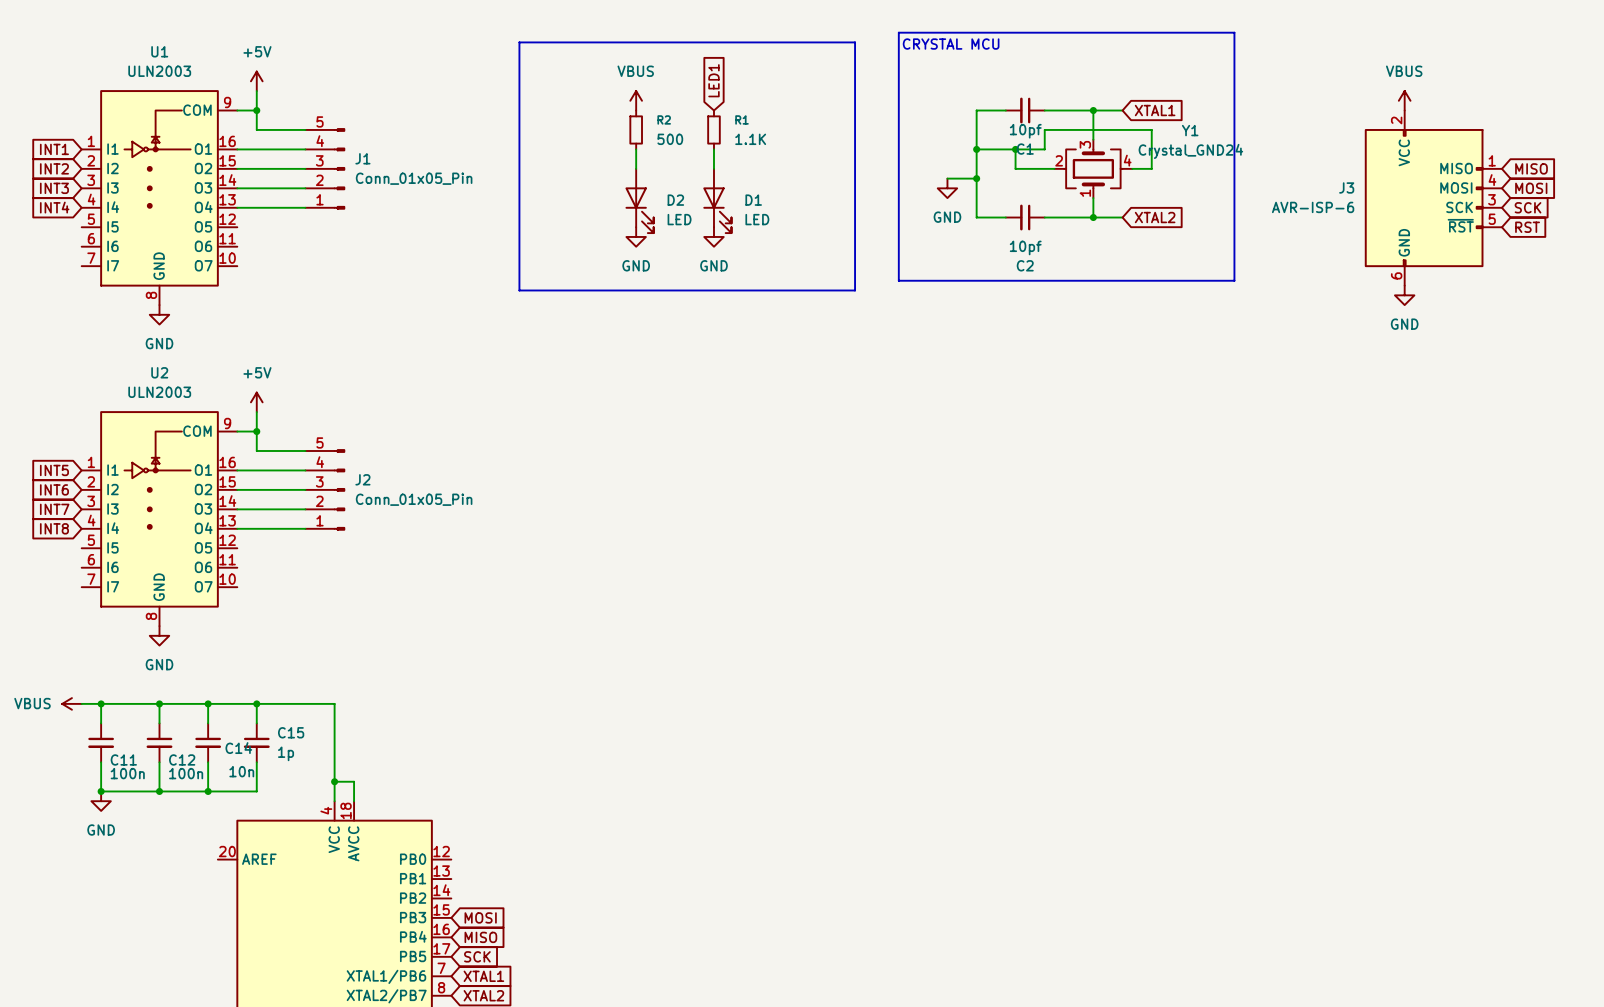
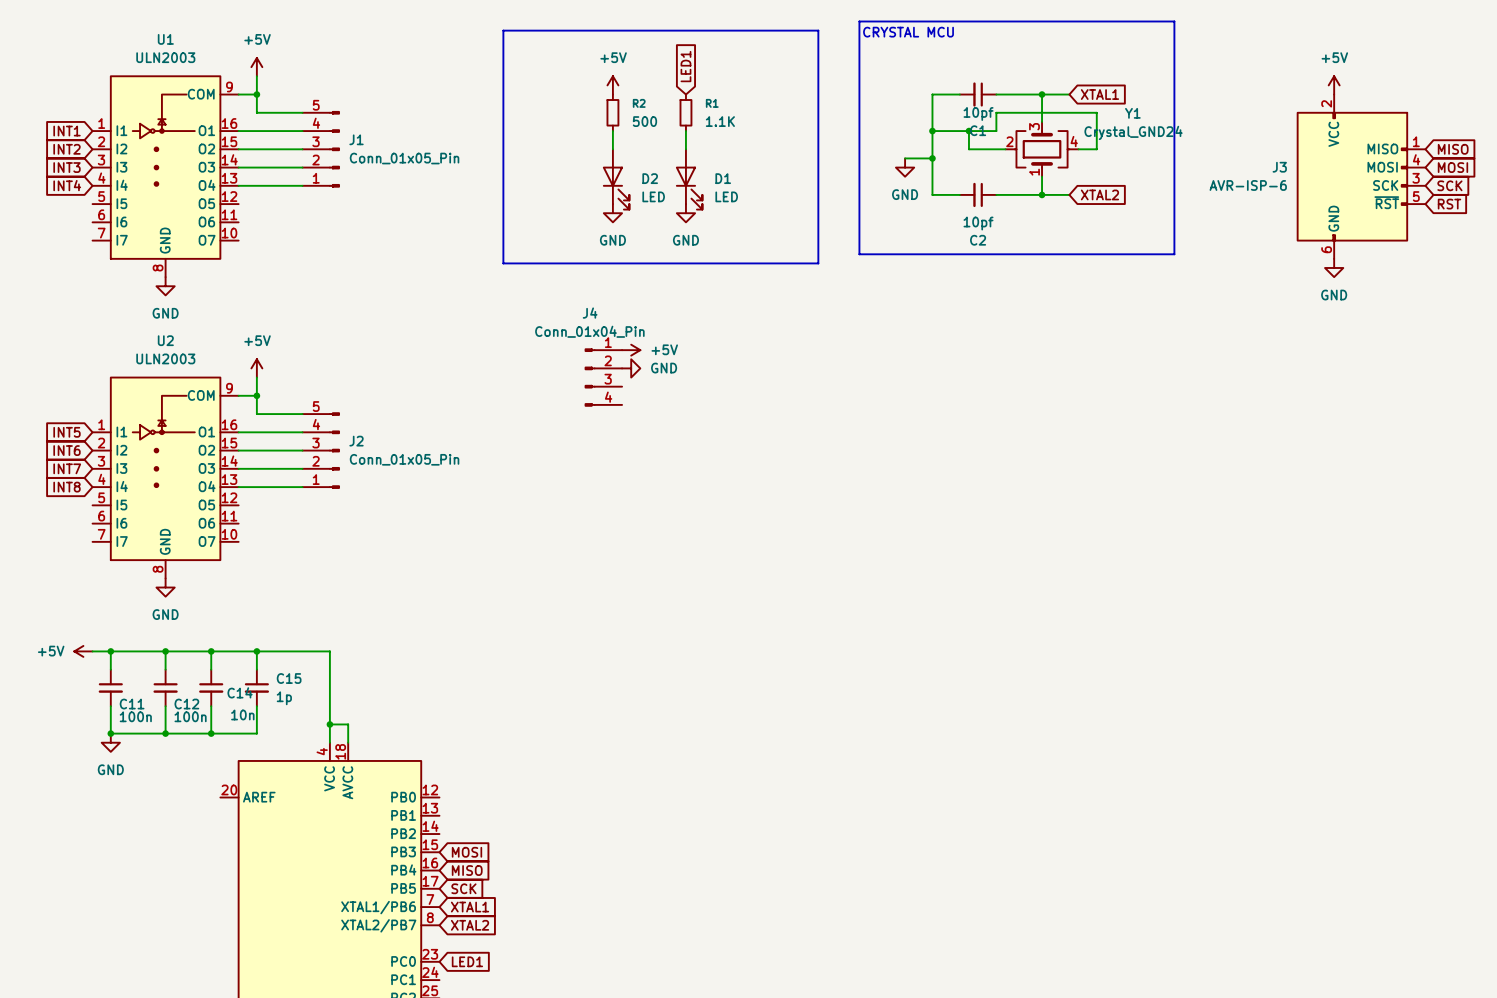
power symbol: VBUS (636, 100) -> +5V (612, 85)
power symbol: VBUS (1404, 100) -> +5V (1334, 85)
power symbol: none -> +5V (631, 350)
power symbol: none -> GND (631, 368)
J4: none -> Conn_01x04_Pin (603, 377)
power symbol: VBUS (71, 703) -> +5V (83, 651)

